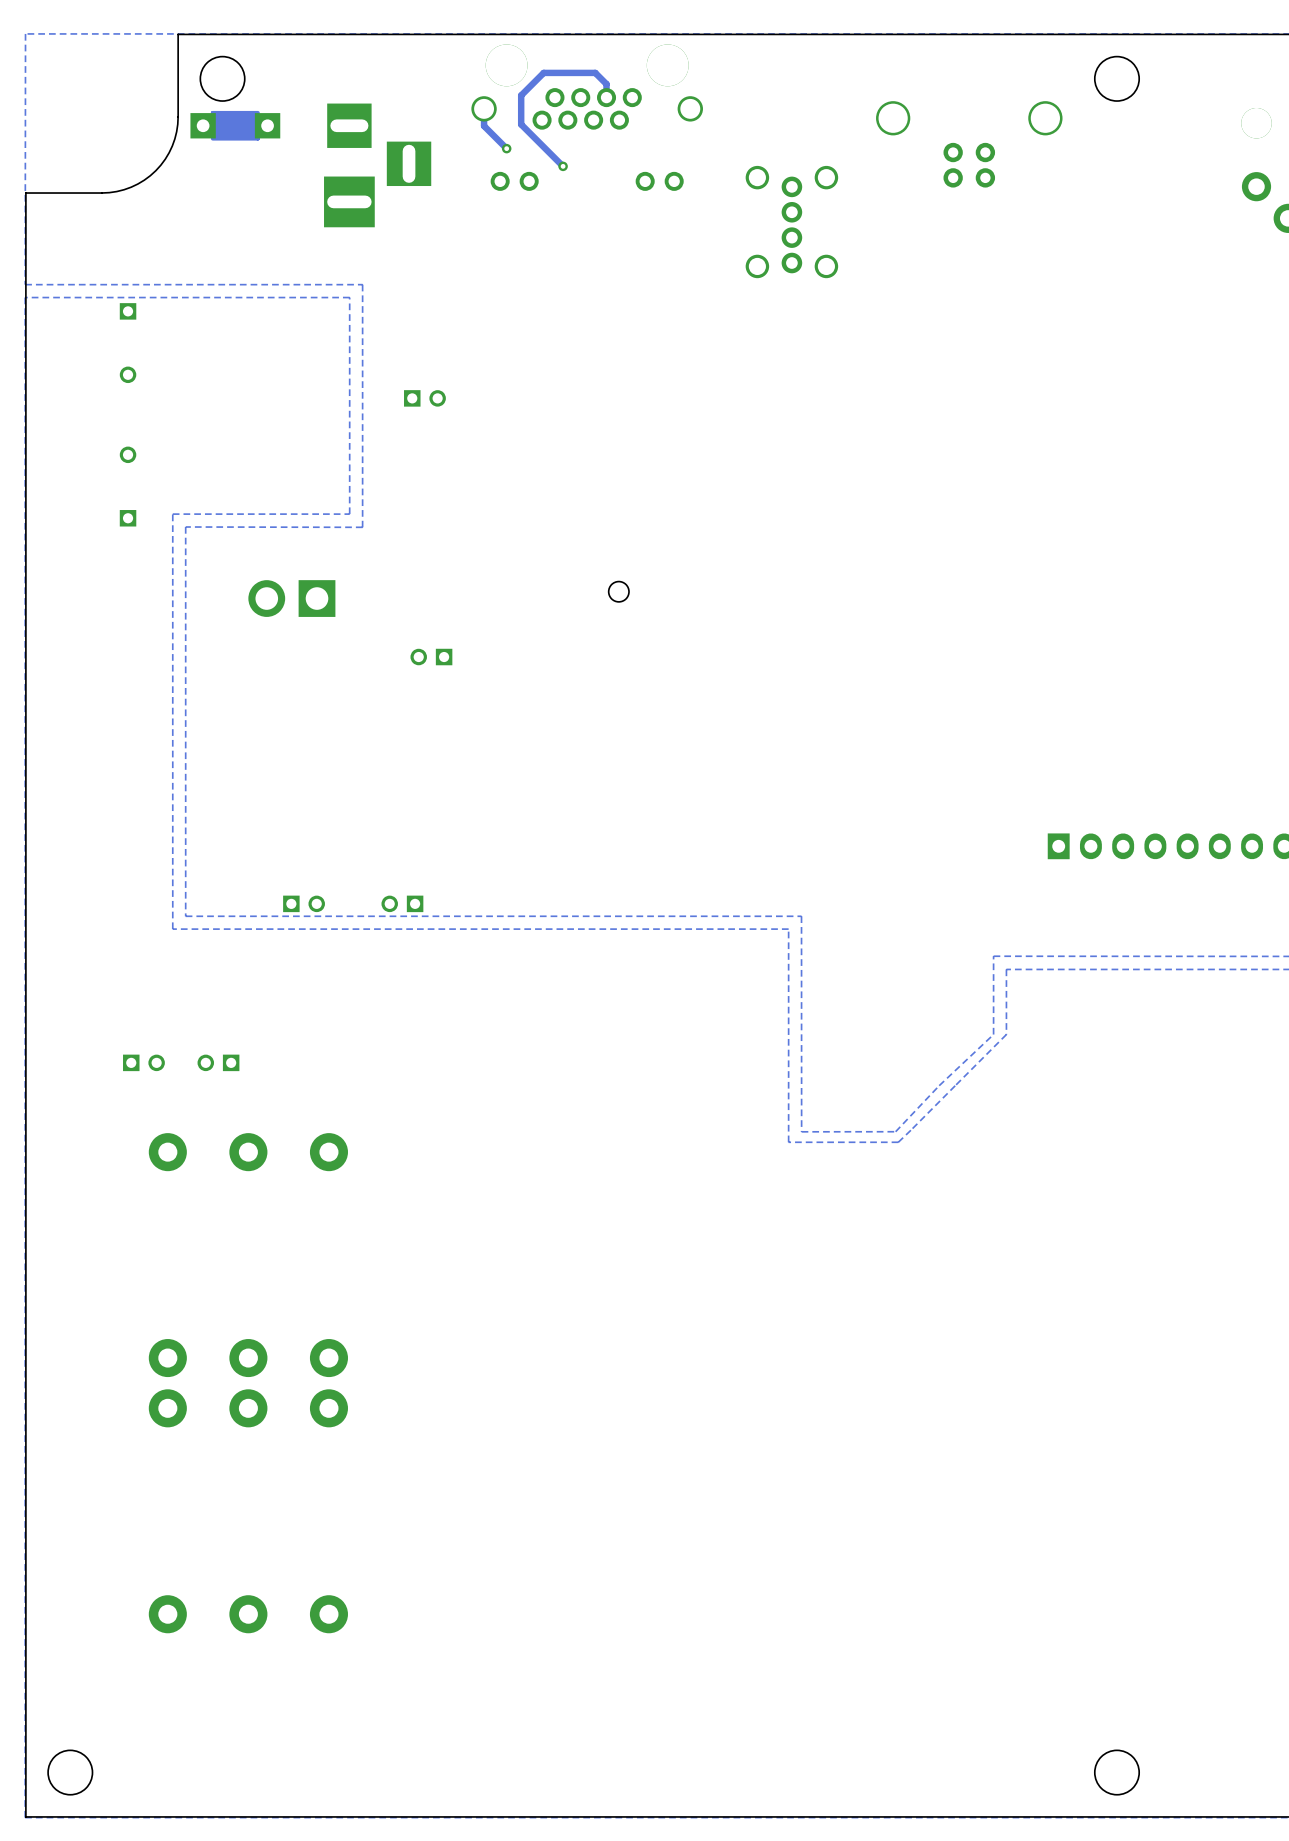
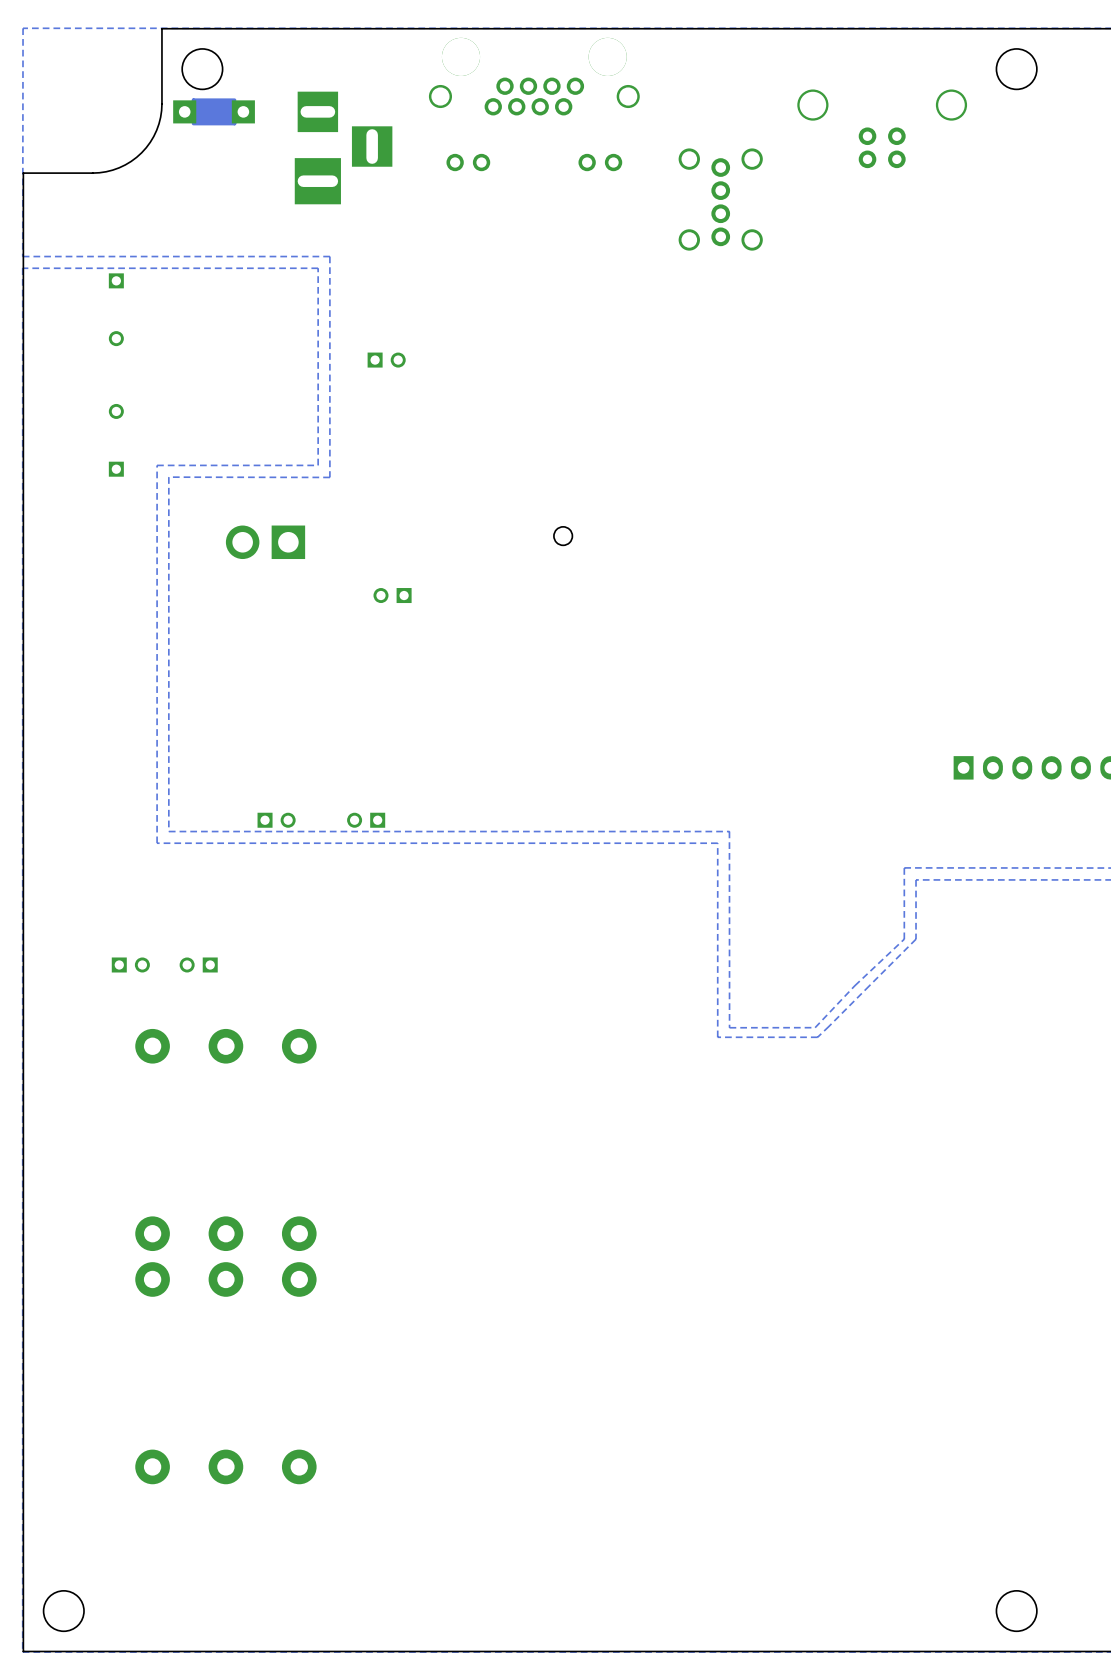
track: (606, 97) (606, 84) (595, 72) (543, 72) (521, 95) (521, 124) (563, 166) -> none
track: (484, 108) (484, 126) (506, 148) -> none
via: (506, 148) -> none
via: (563, 166) -> none

